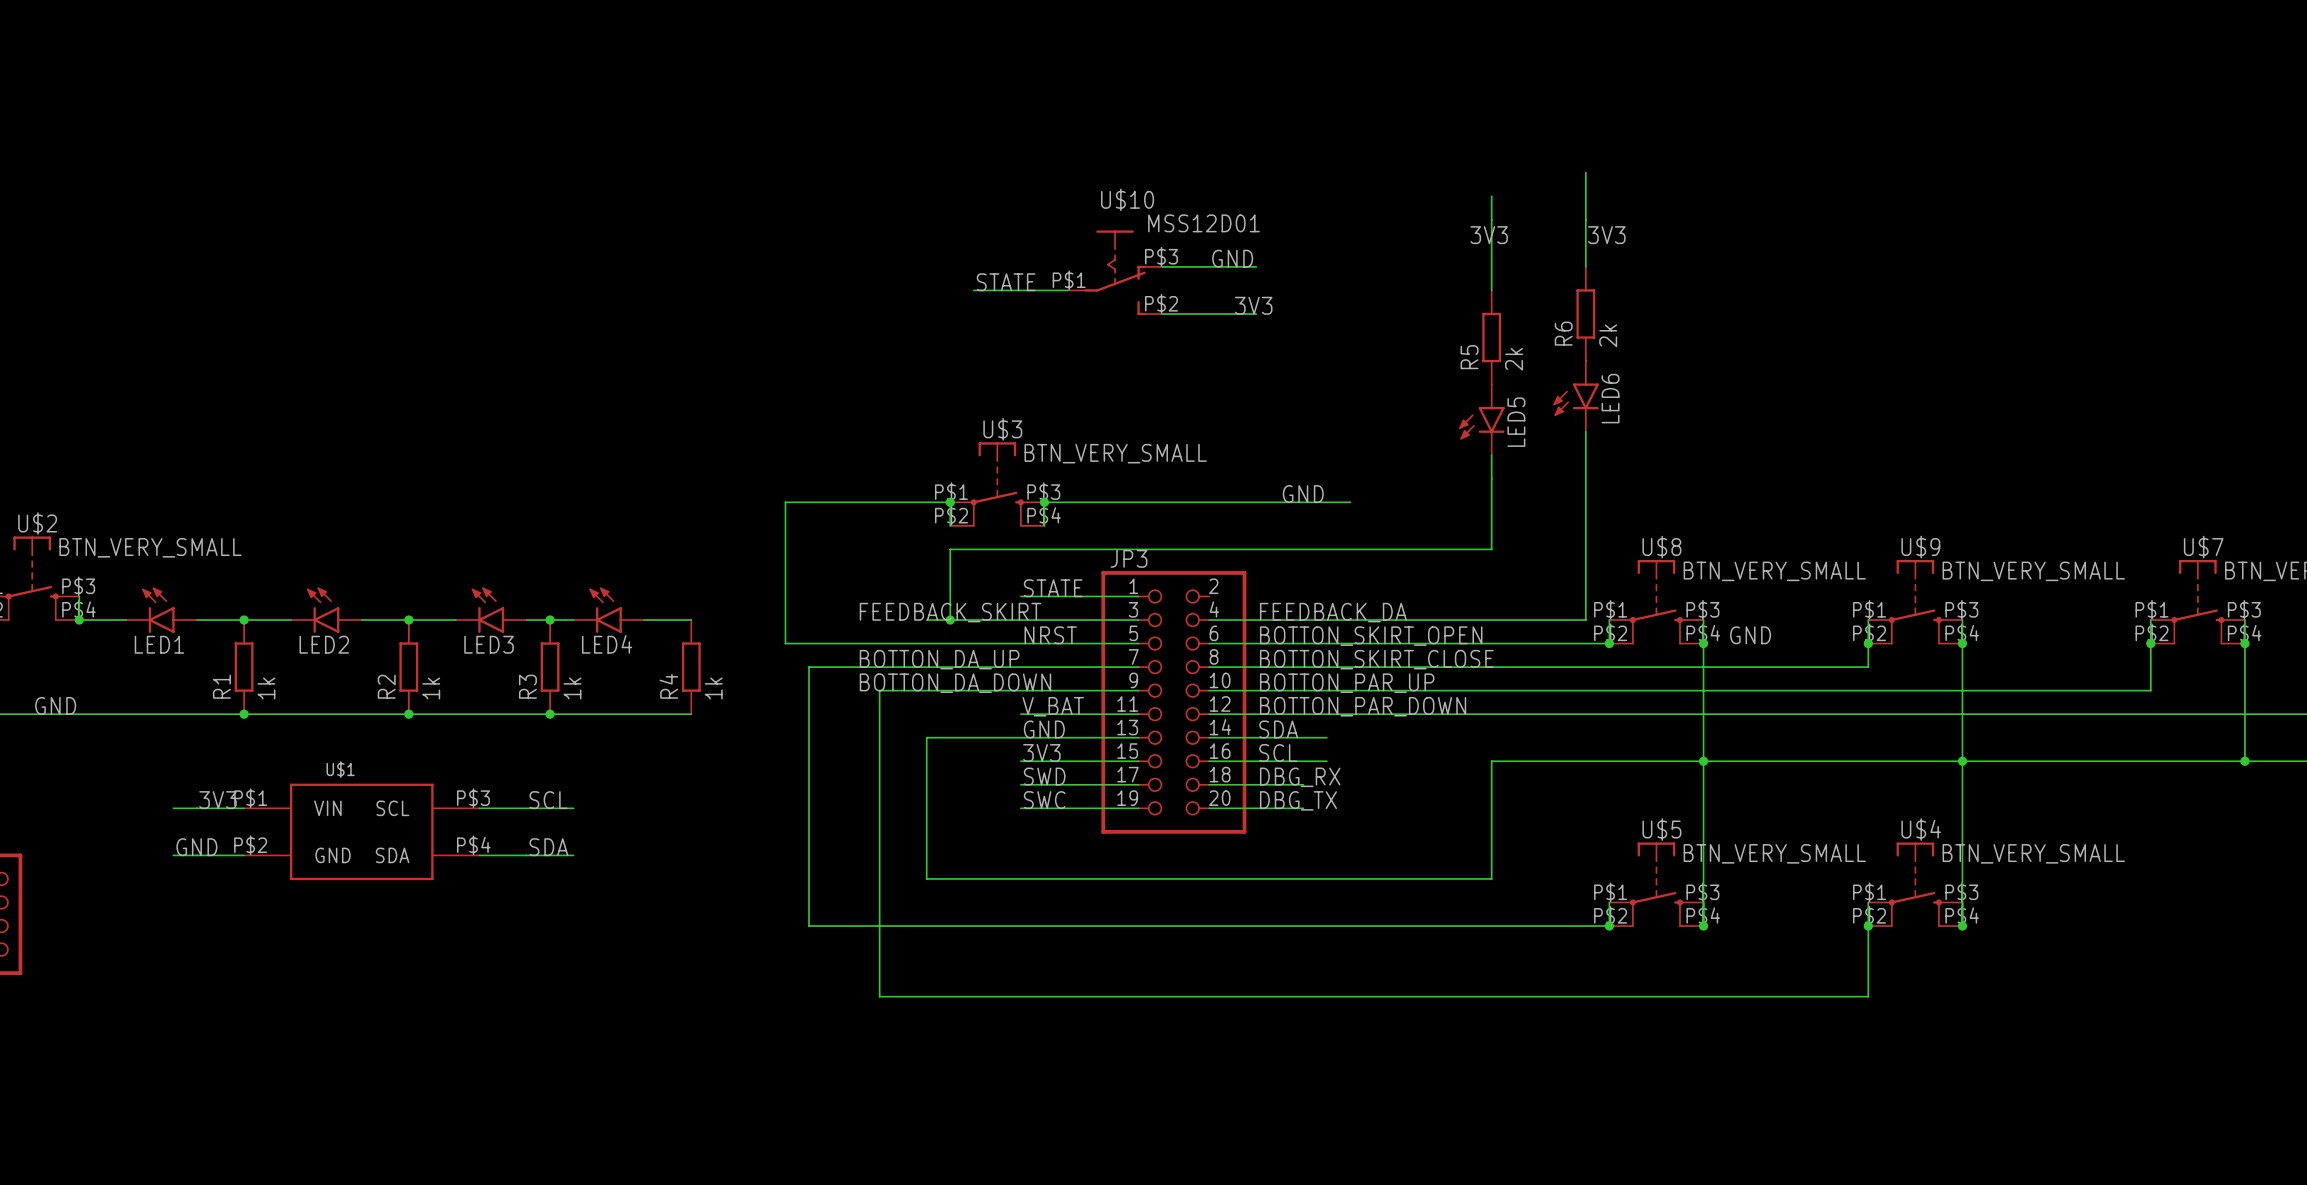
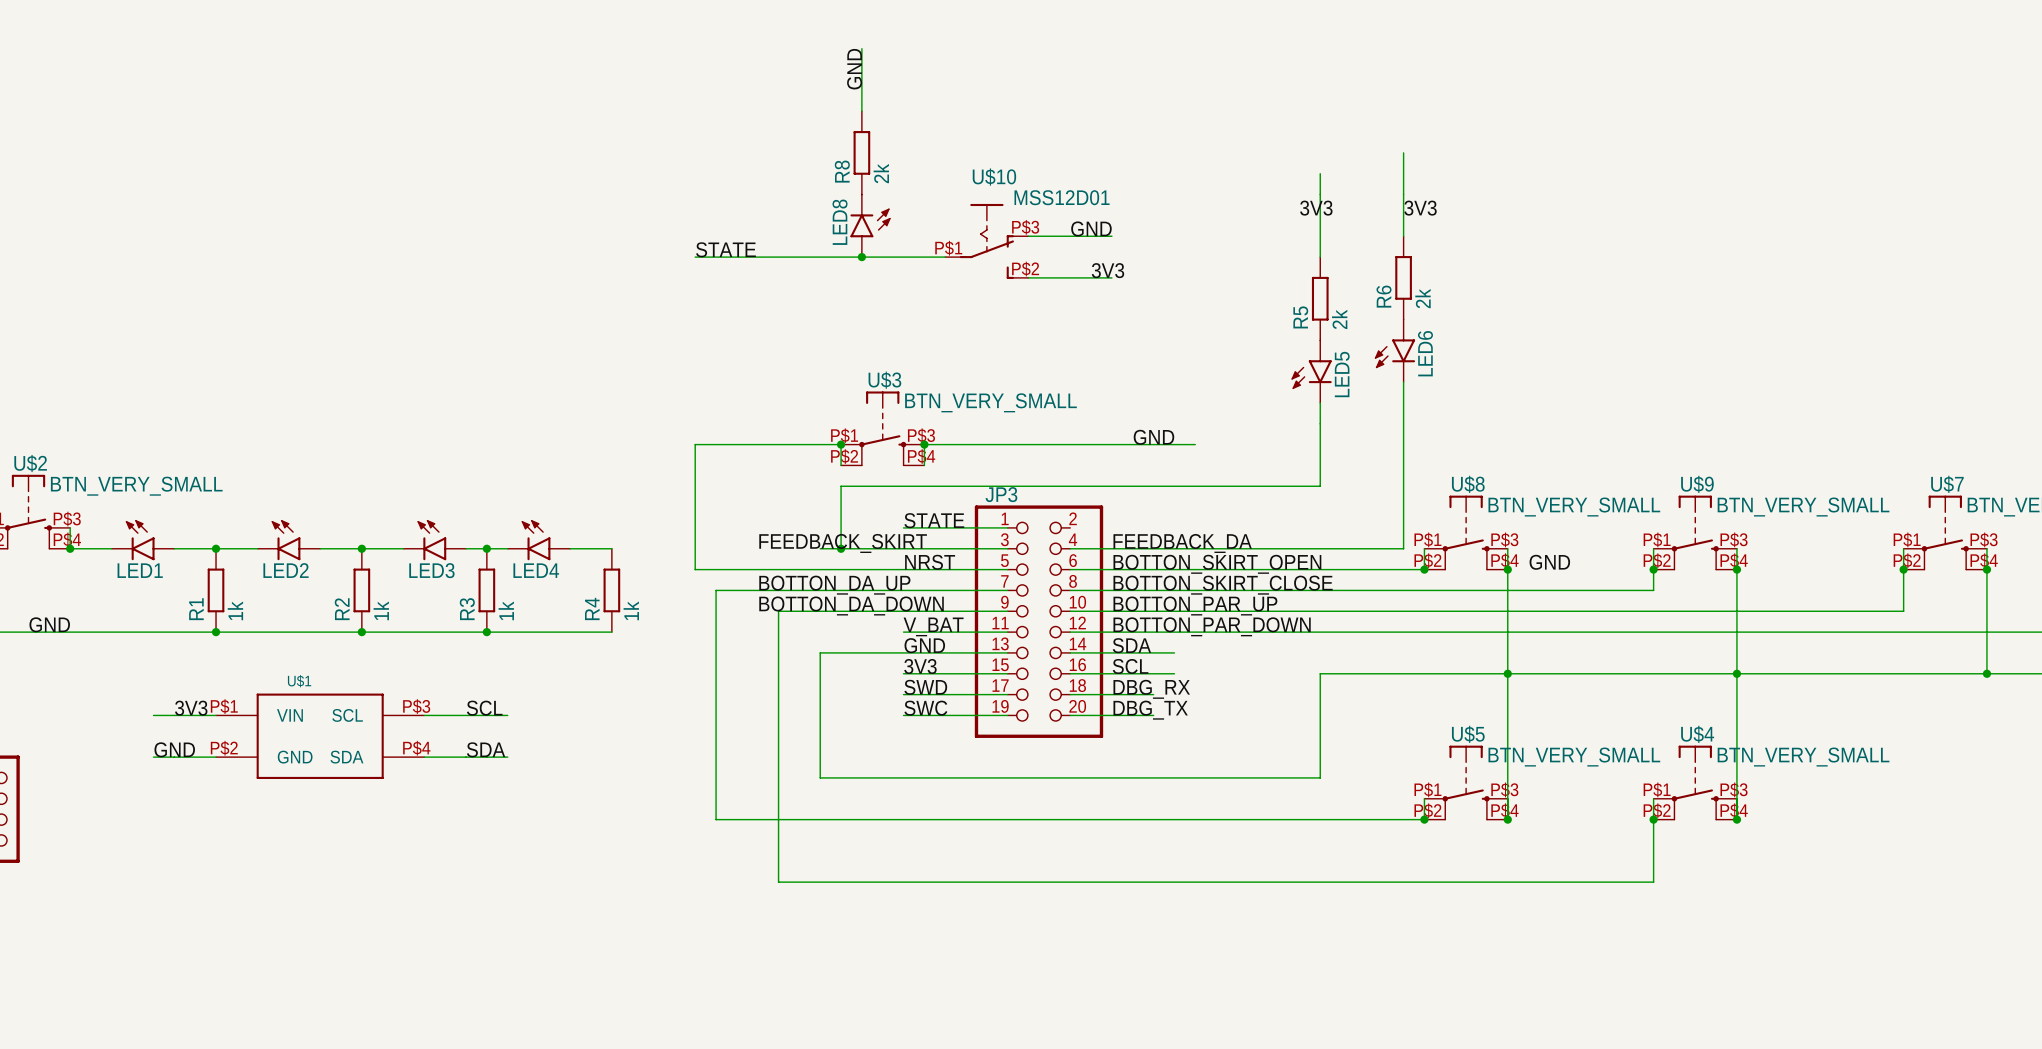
wire: none -> (861, 48) (861, 111)
label: none -> GND (854, 69)
R8: none -> 2k (861, 152)
LED8: none -> (870, 225)
label position: STATE (1006, 282) -> STATE (725, 249)
wire: none -> (695, 257) (861, 257)
junction: none -> (861, 257)

